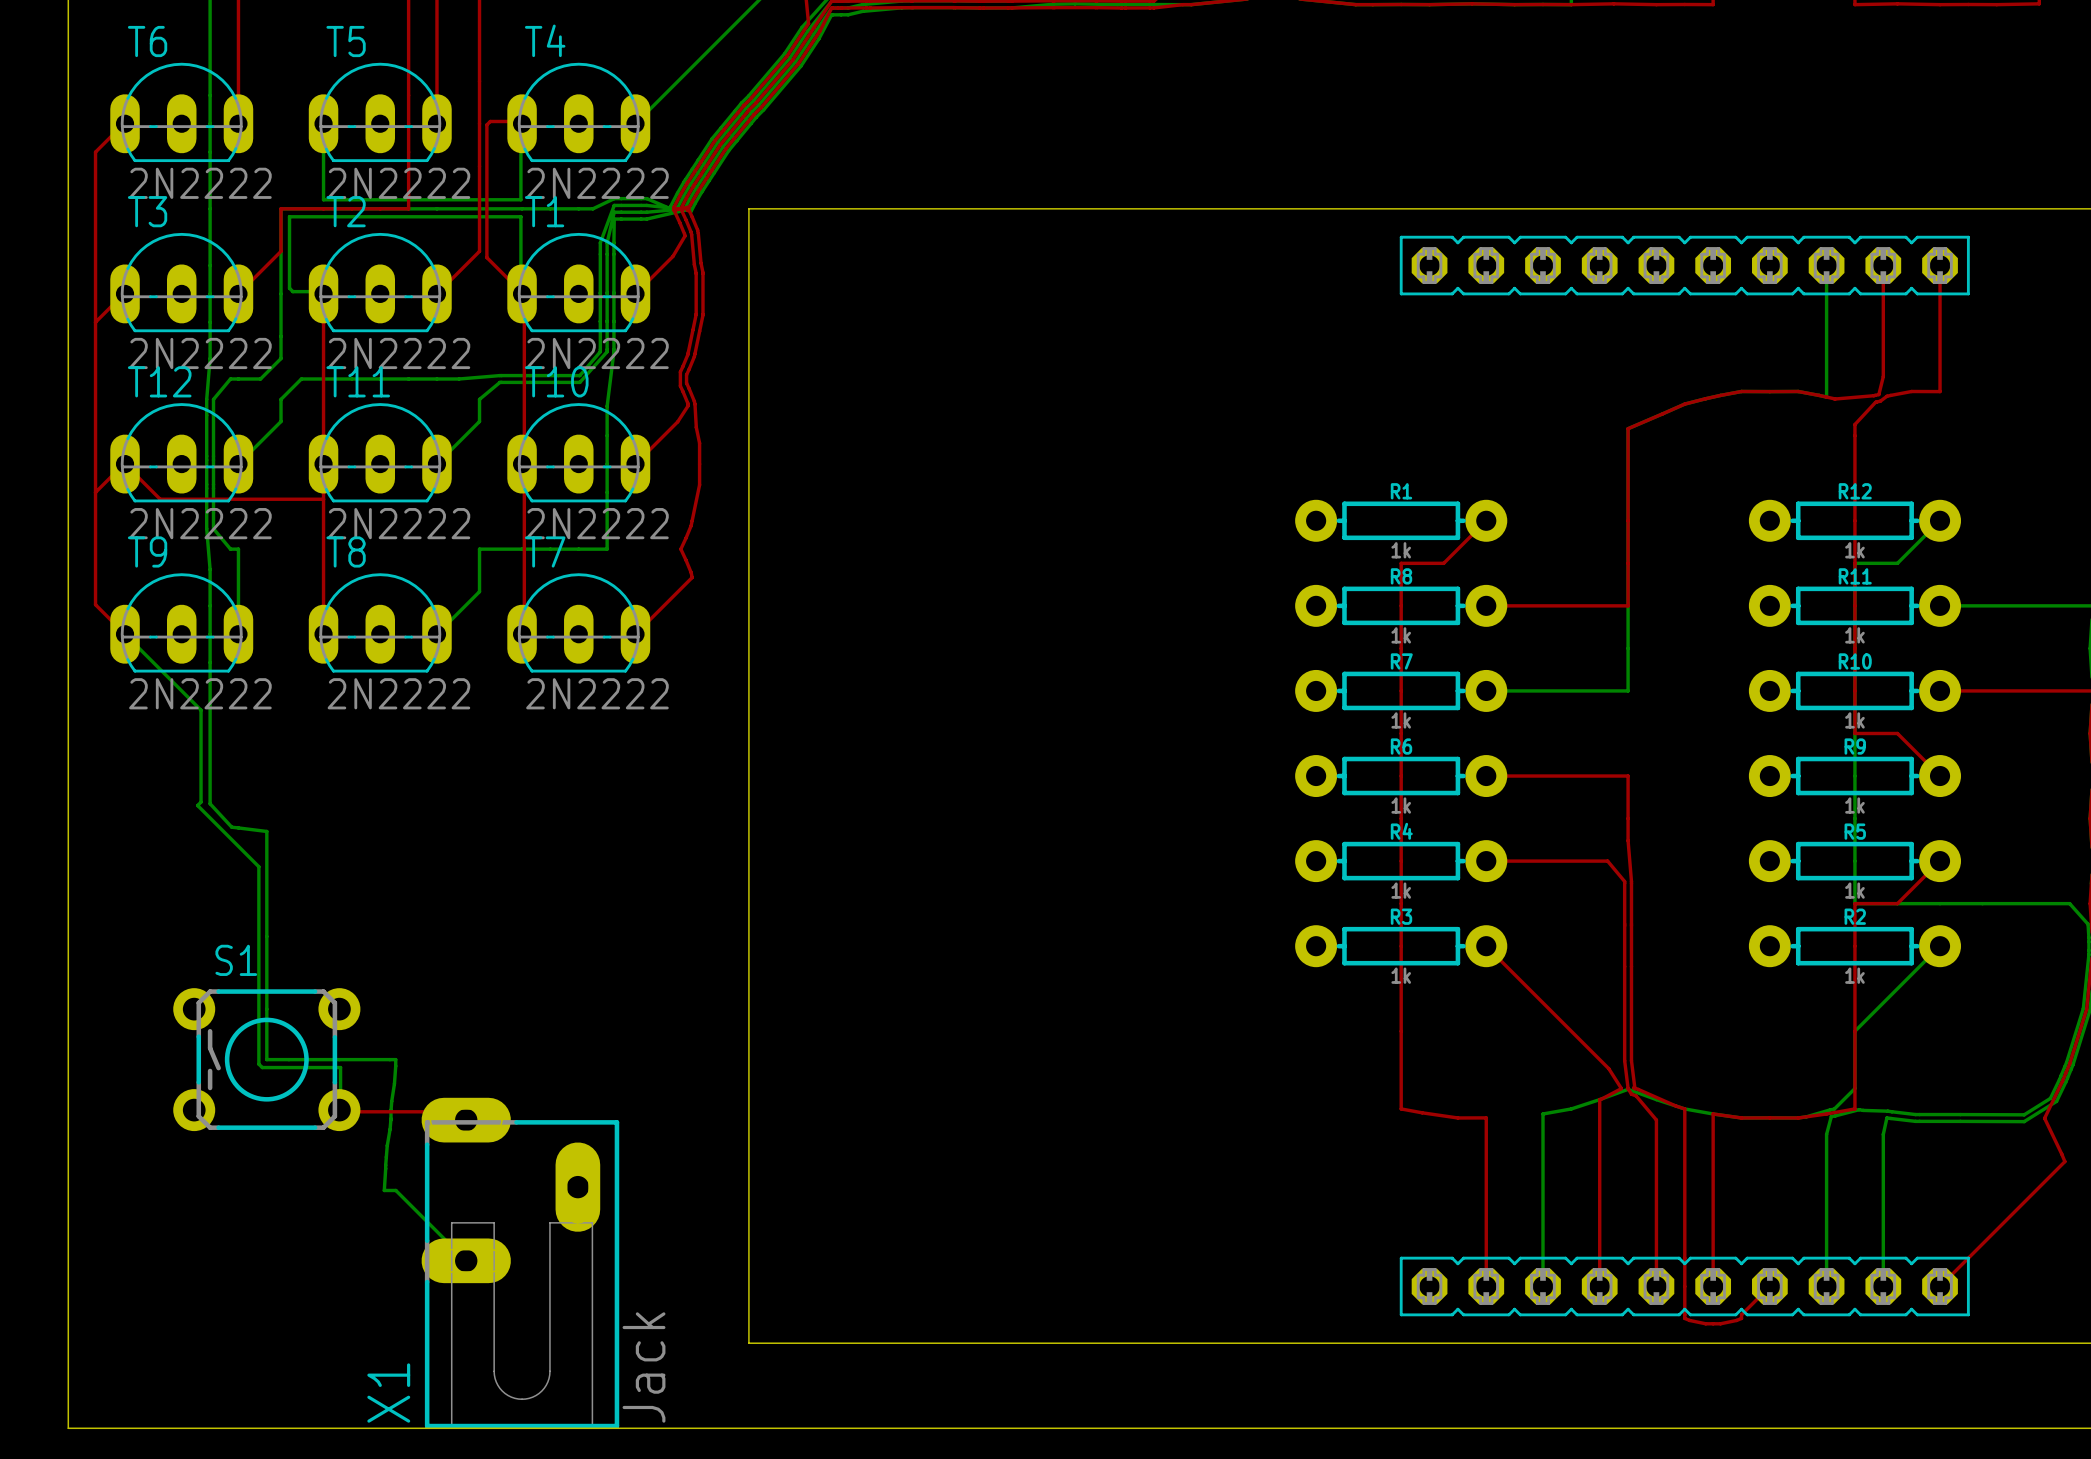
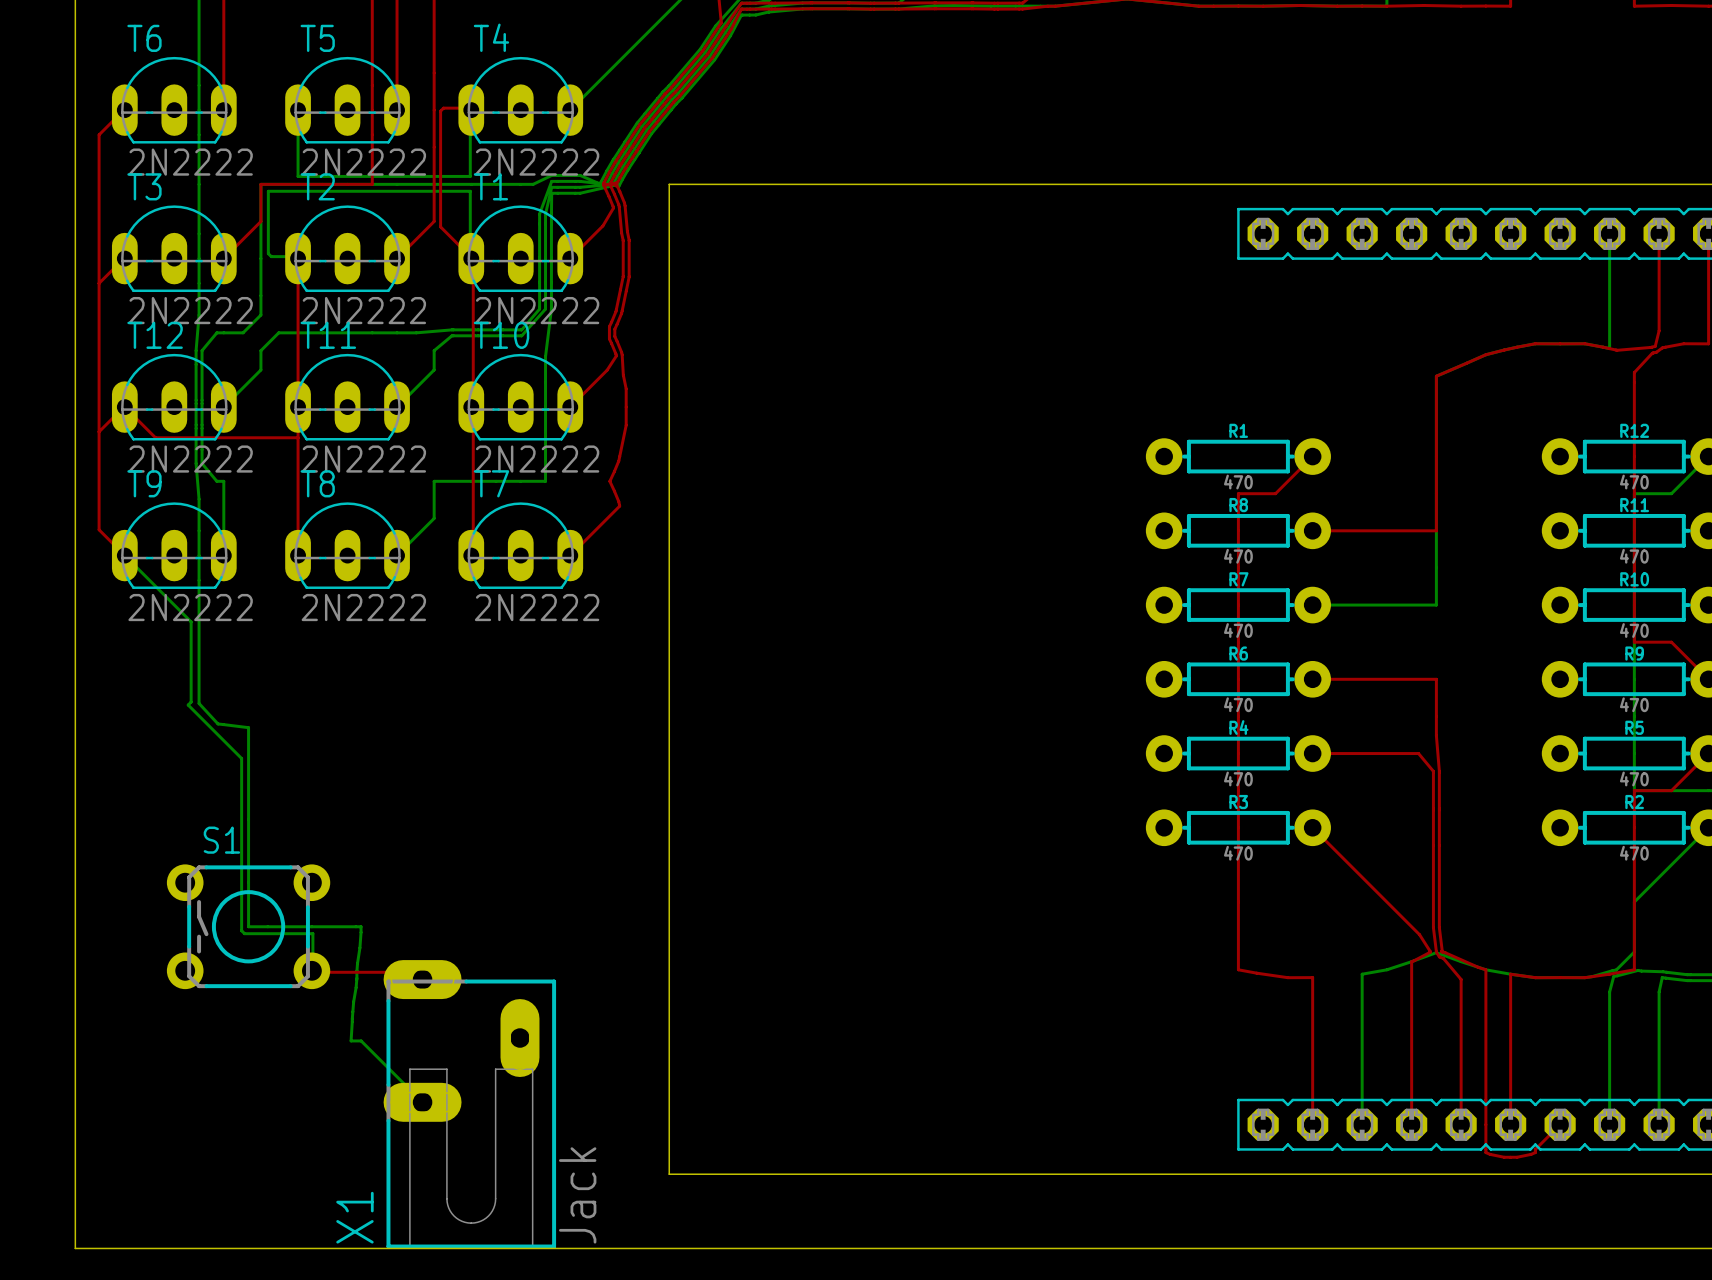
R1 value: 1k (1401, 550) -> 470 (1238, 482)
R12 value: 1k (1854, 550) -> 470 (1634, 482)
R8 value: 1k (1401, 635) -> 470 (1238, 556)
R11 value: 1k (1854, 635) -> 470 (1634, 556)
R7 value: 1k (1401, 720) -> 470 (1238, 630)
R10 value: 1k (1854, 720) -> 470 (1634, 630)
R6 value: 1k (1401, 805) -> 470 (1238, 704)
R9 value: 1k (1854, 805) -> 470 (1634, 704)
R4 value: 1k (1401, 890) -> 470 (1238, 778)
R5 value: 1k (1854, 890) -> 470 (1634, 778)
R3 value: 1k (1401, 975) -> 470 (1238, 853)
R2 value: 1k (1854, 975) -> 470 (1634, 853)

